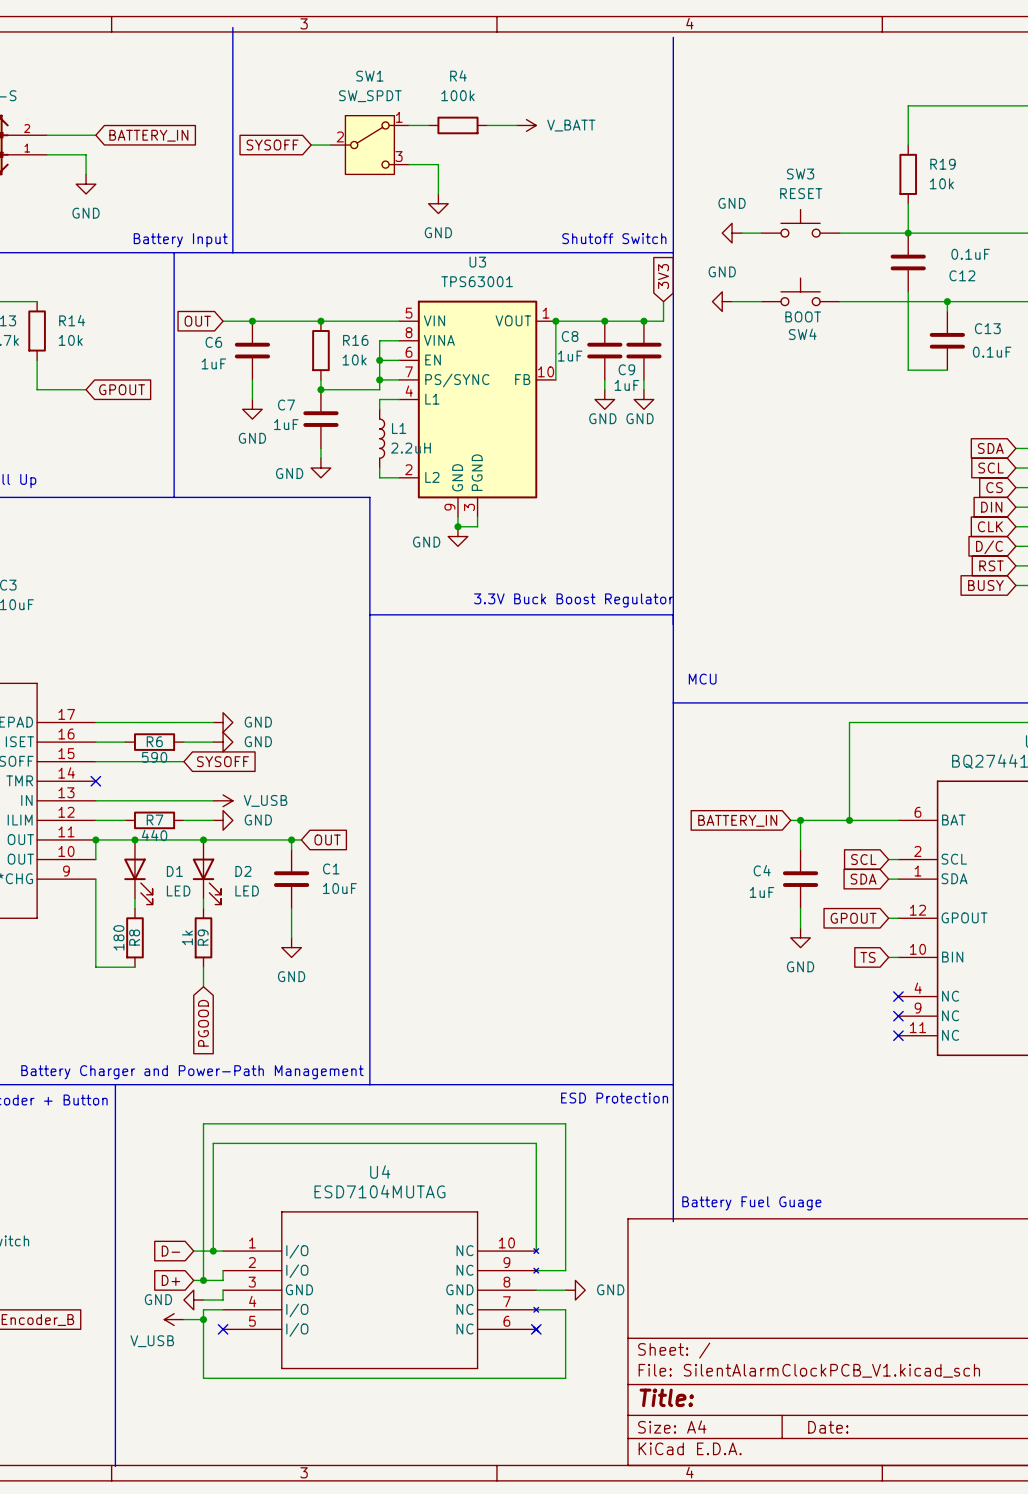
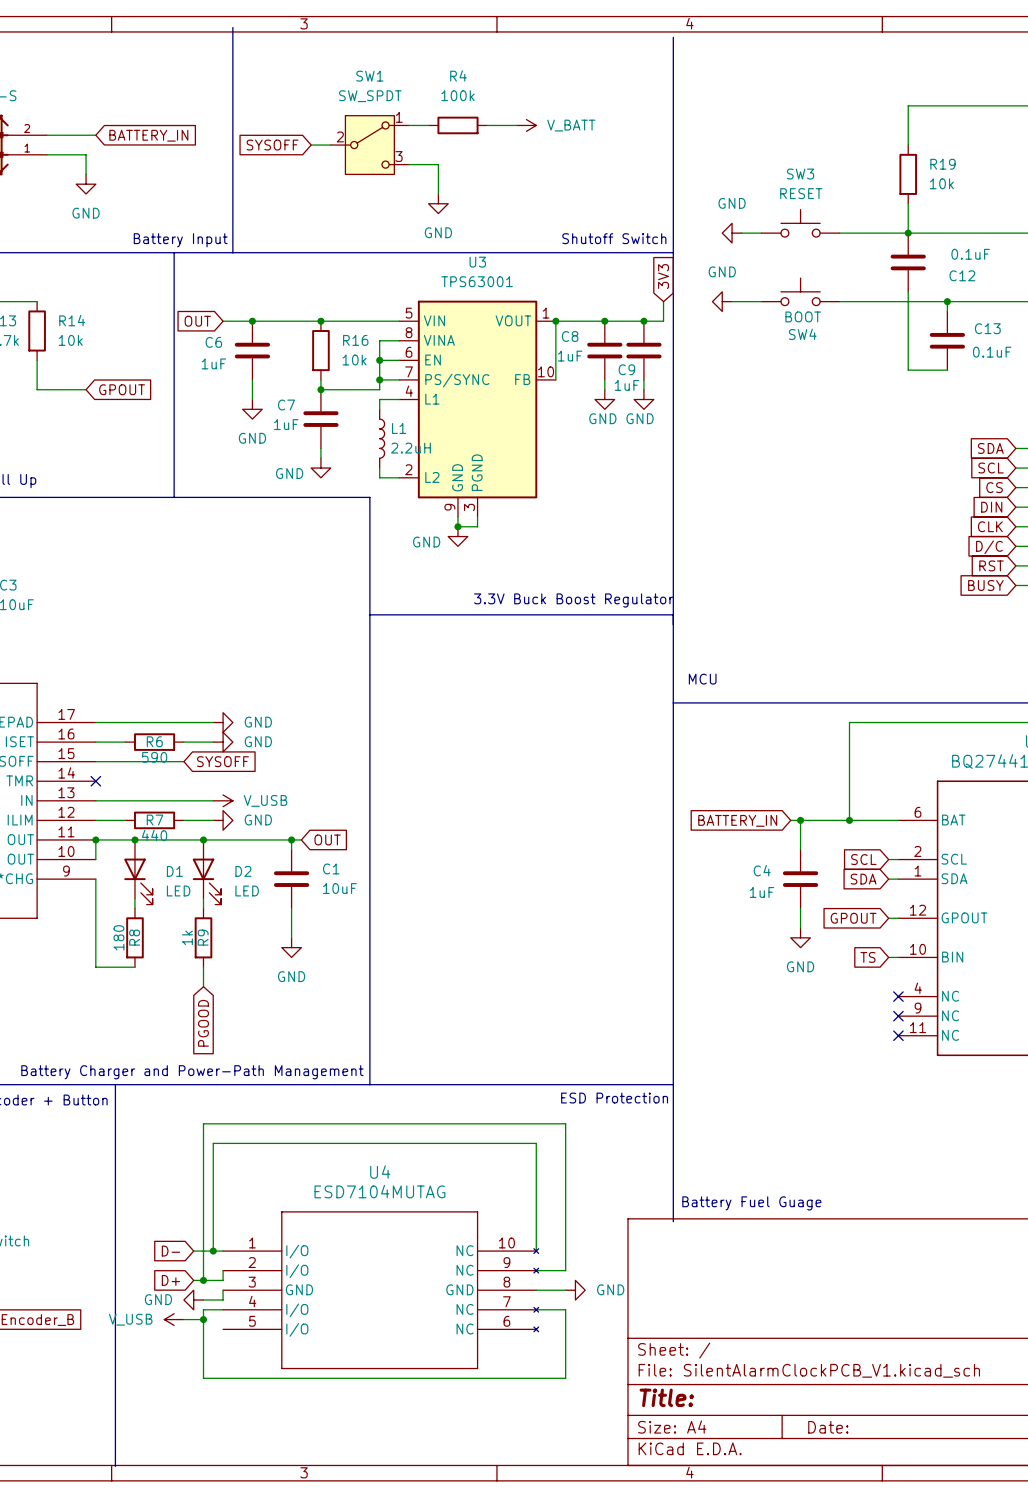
no-connect mark: (223, 1329) -> none
no-connect mark: (536, 1329) -> none
power symbol text position: V_USB (152, 1341) -> V_USB (130, 1319)

